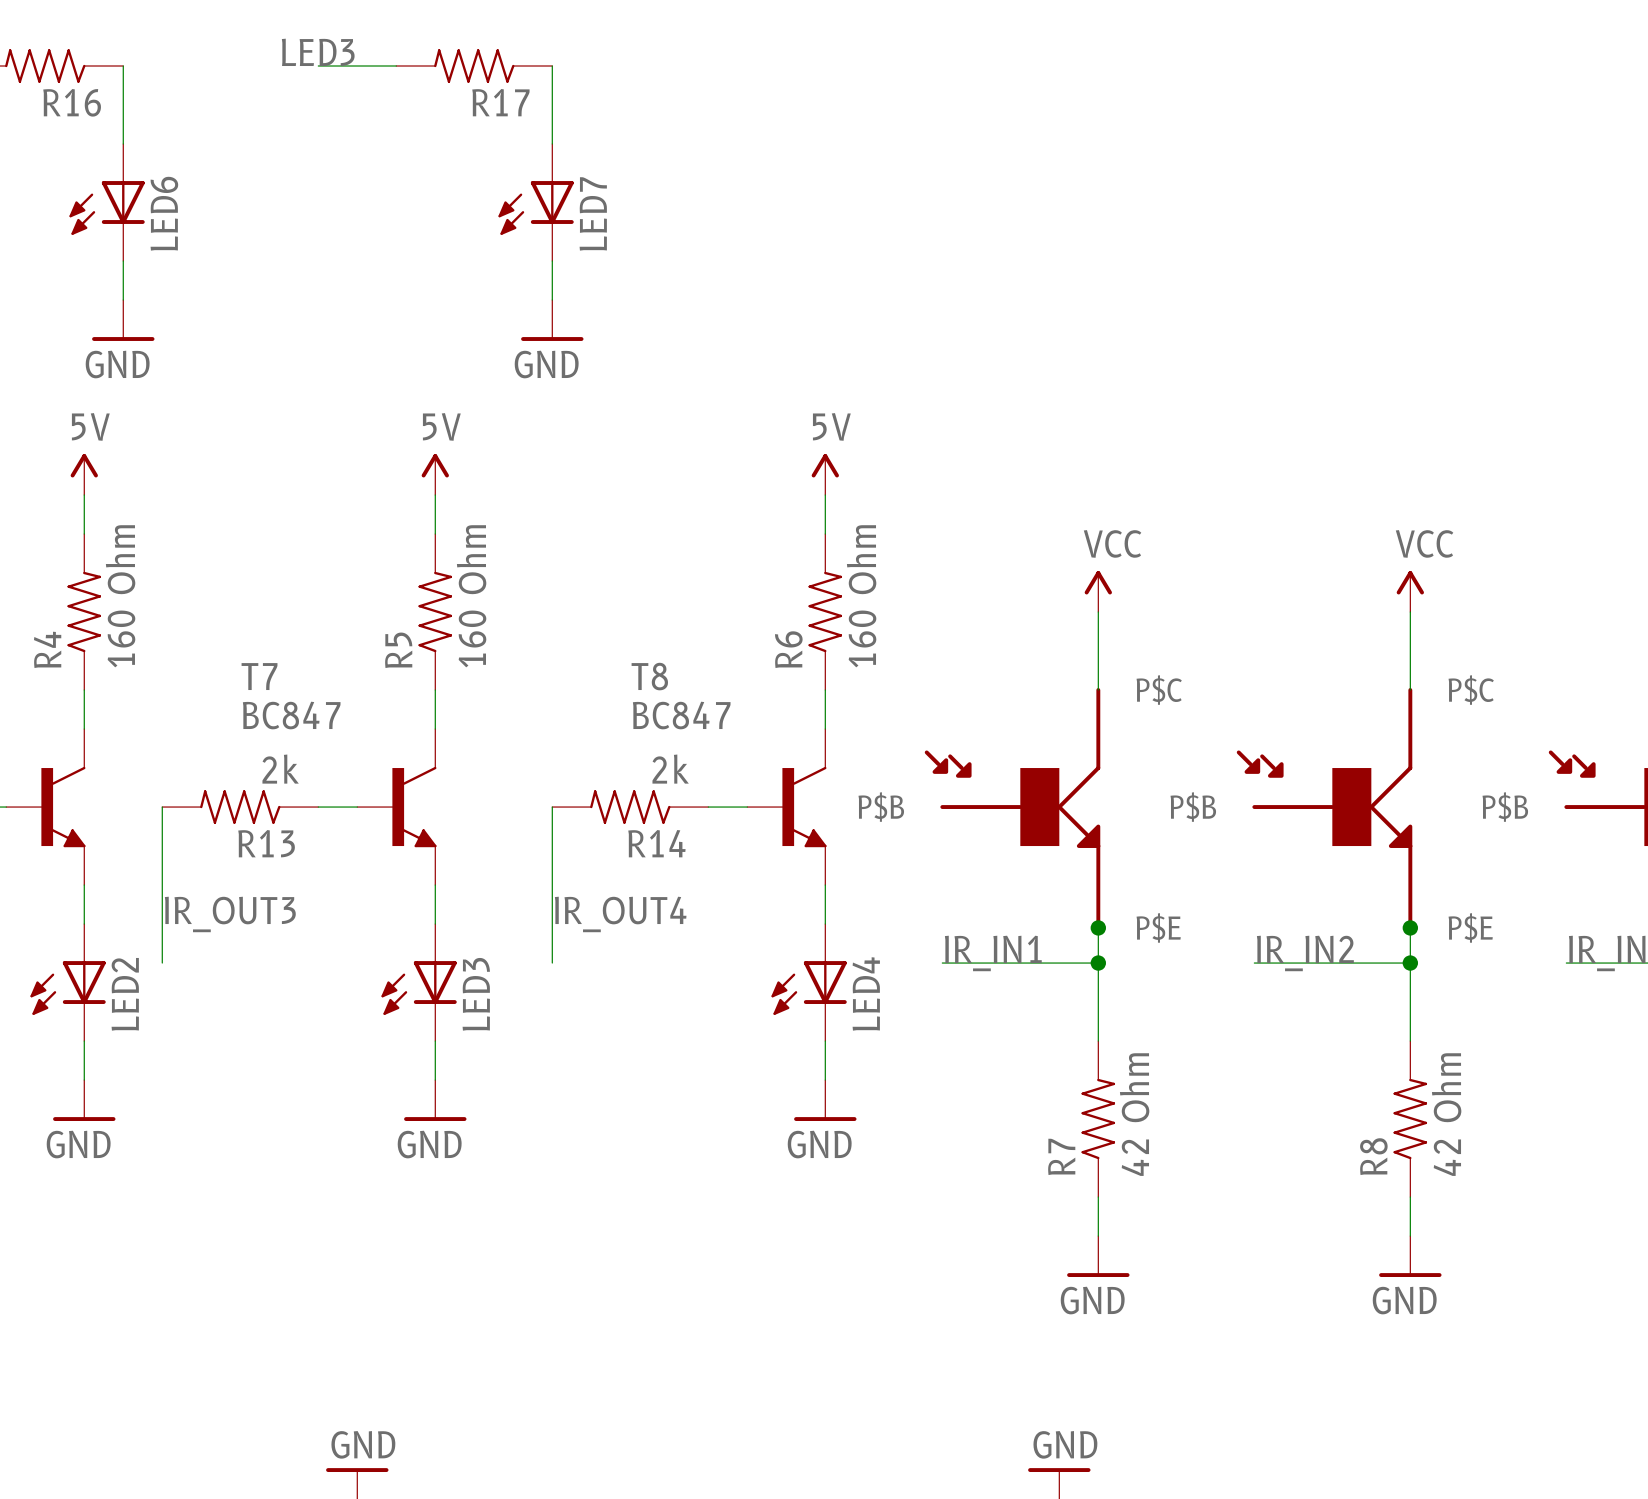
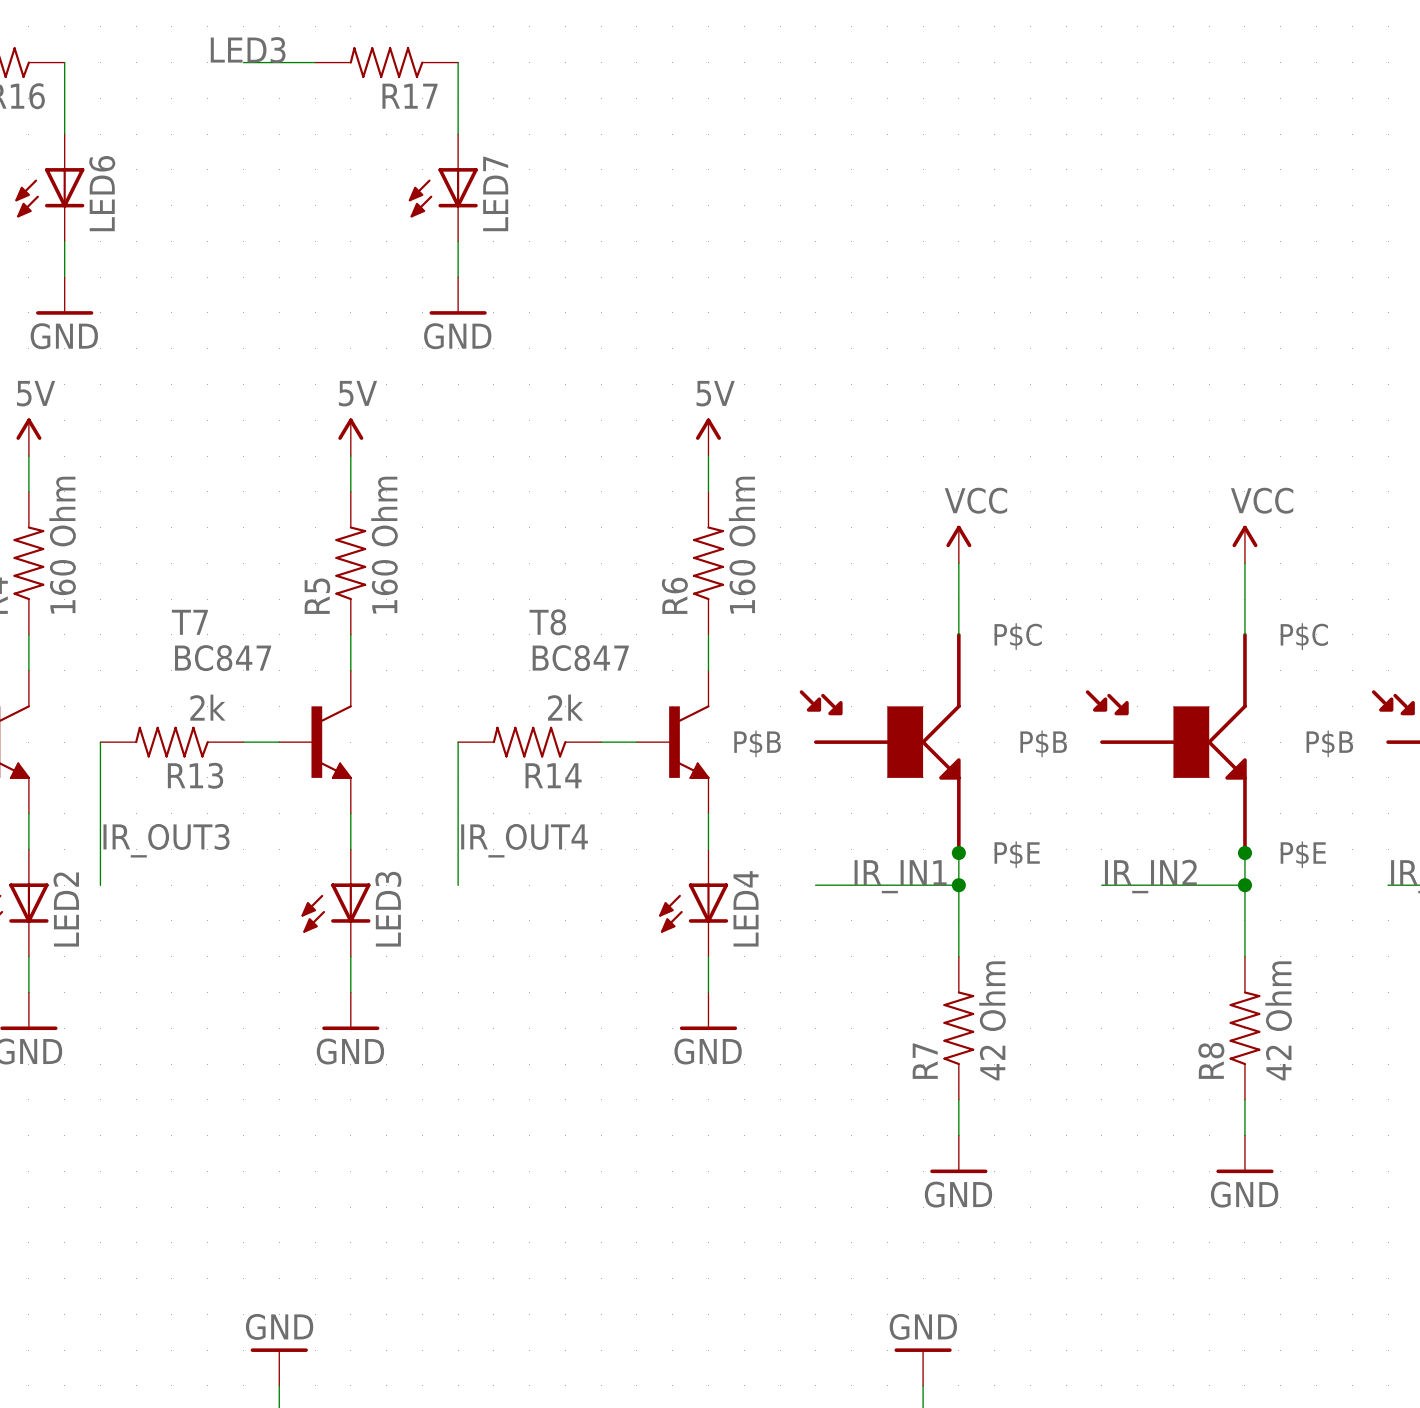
label position: IR_IN1 (993, 953) -> IR_IN1 (900, 876)

